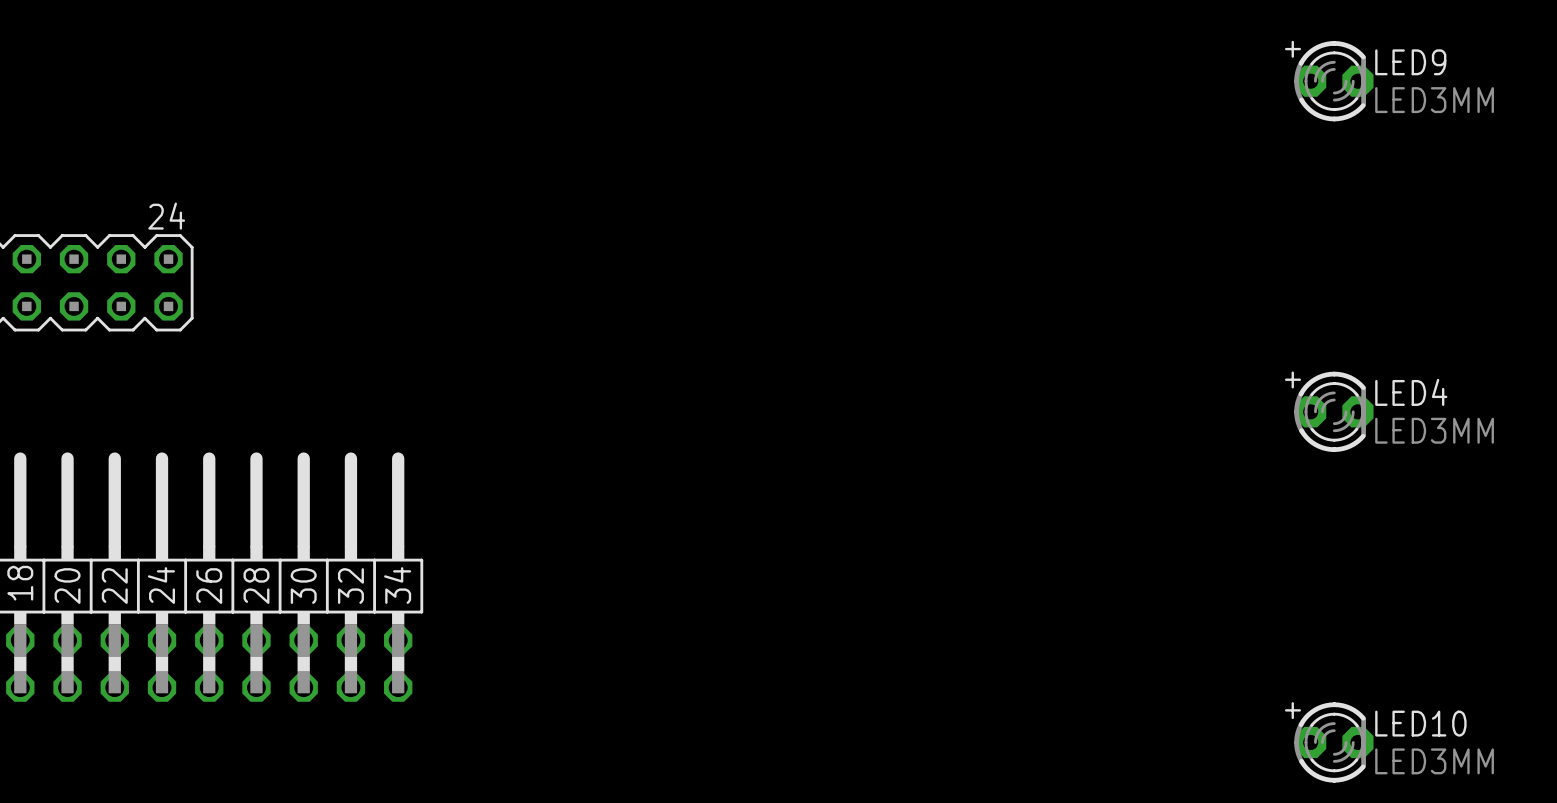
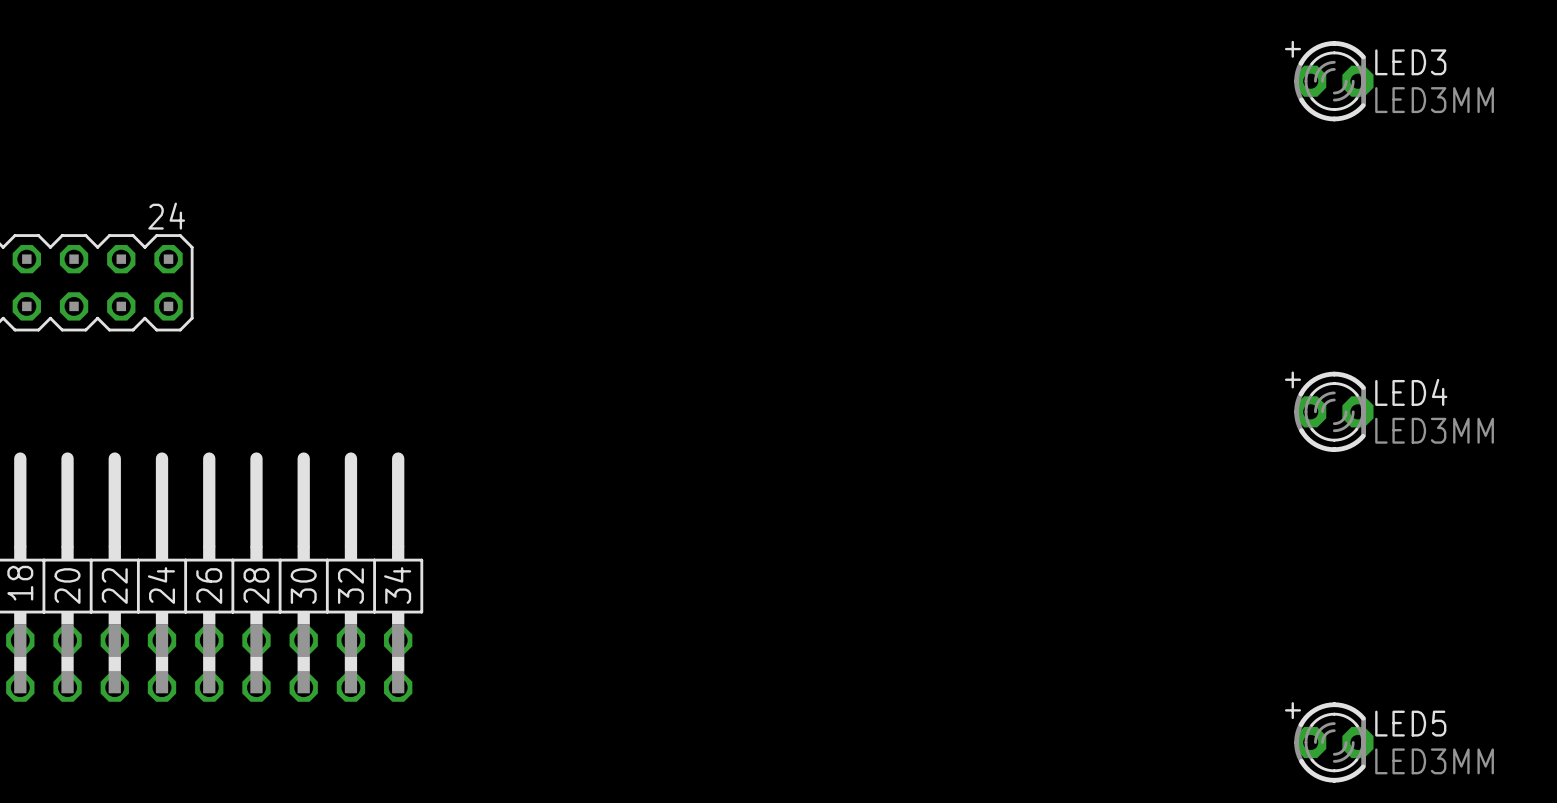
LED9 name: LED9 (1410, 62) -> LED3 (1410, 62)
LED10 name: LED10 (1420, 723) -> LED5 (1410, 723)

